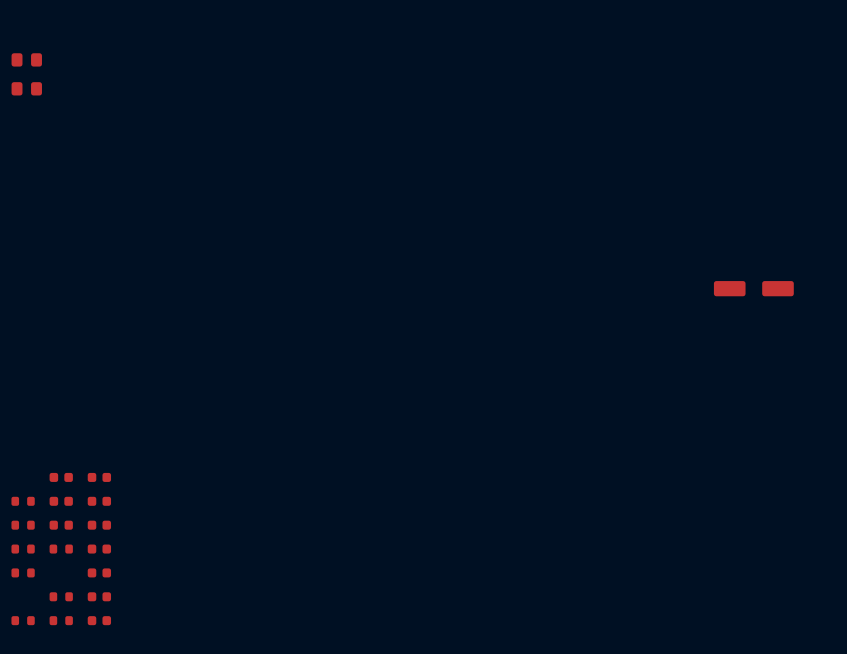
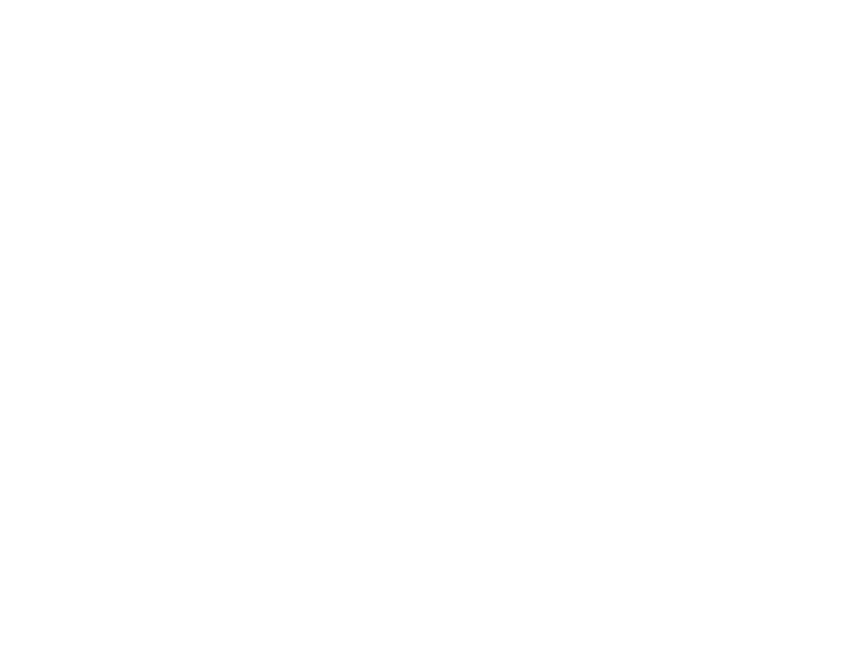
part: (26, 59) -> none
part: (26, 88) -> none
part: (753, 288) -> none
part: (61, 477) -> none
part: (99, 477) -> none
part: (23, 501) -> none
part: (61, 501) -> none
part: (99, 501) -> none
part: (23, 525) -> none
part: (61, 525) -> none
part: (99, 525) -> none
part: (23, 549) -> none
part: (61, 549) -> none
part: (99, 549) -> none
part: (23, 572) -> none
part: (99, 572) -> none
part: (61, 596) -> none
part: (99, 596) -> none
part: (23, 620) -> none
part: (61, 620) -> none
part: (99, 620) -> none

